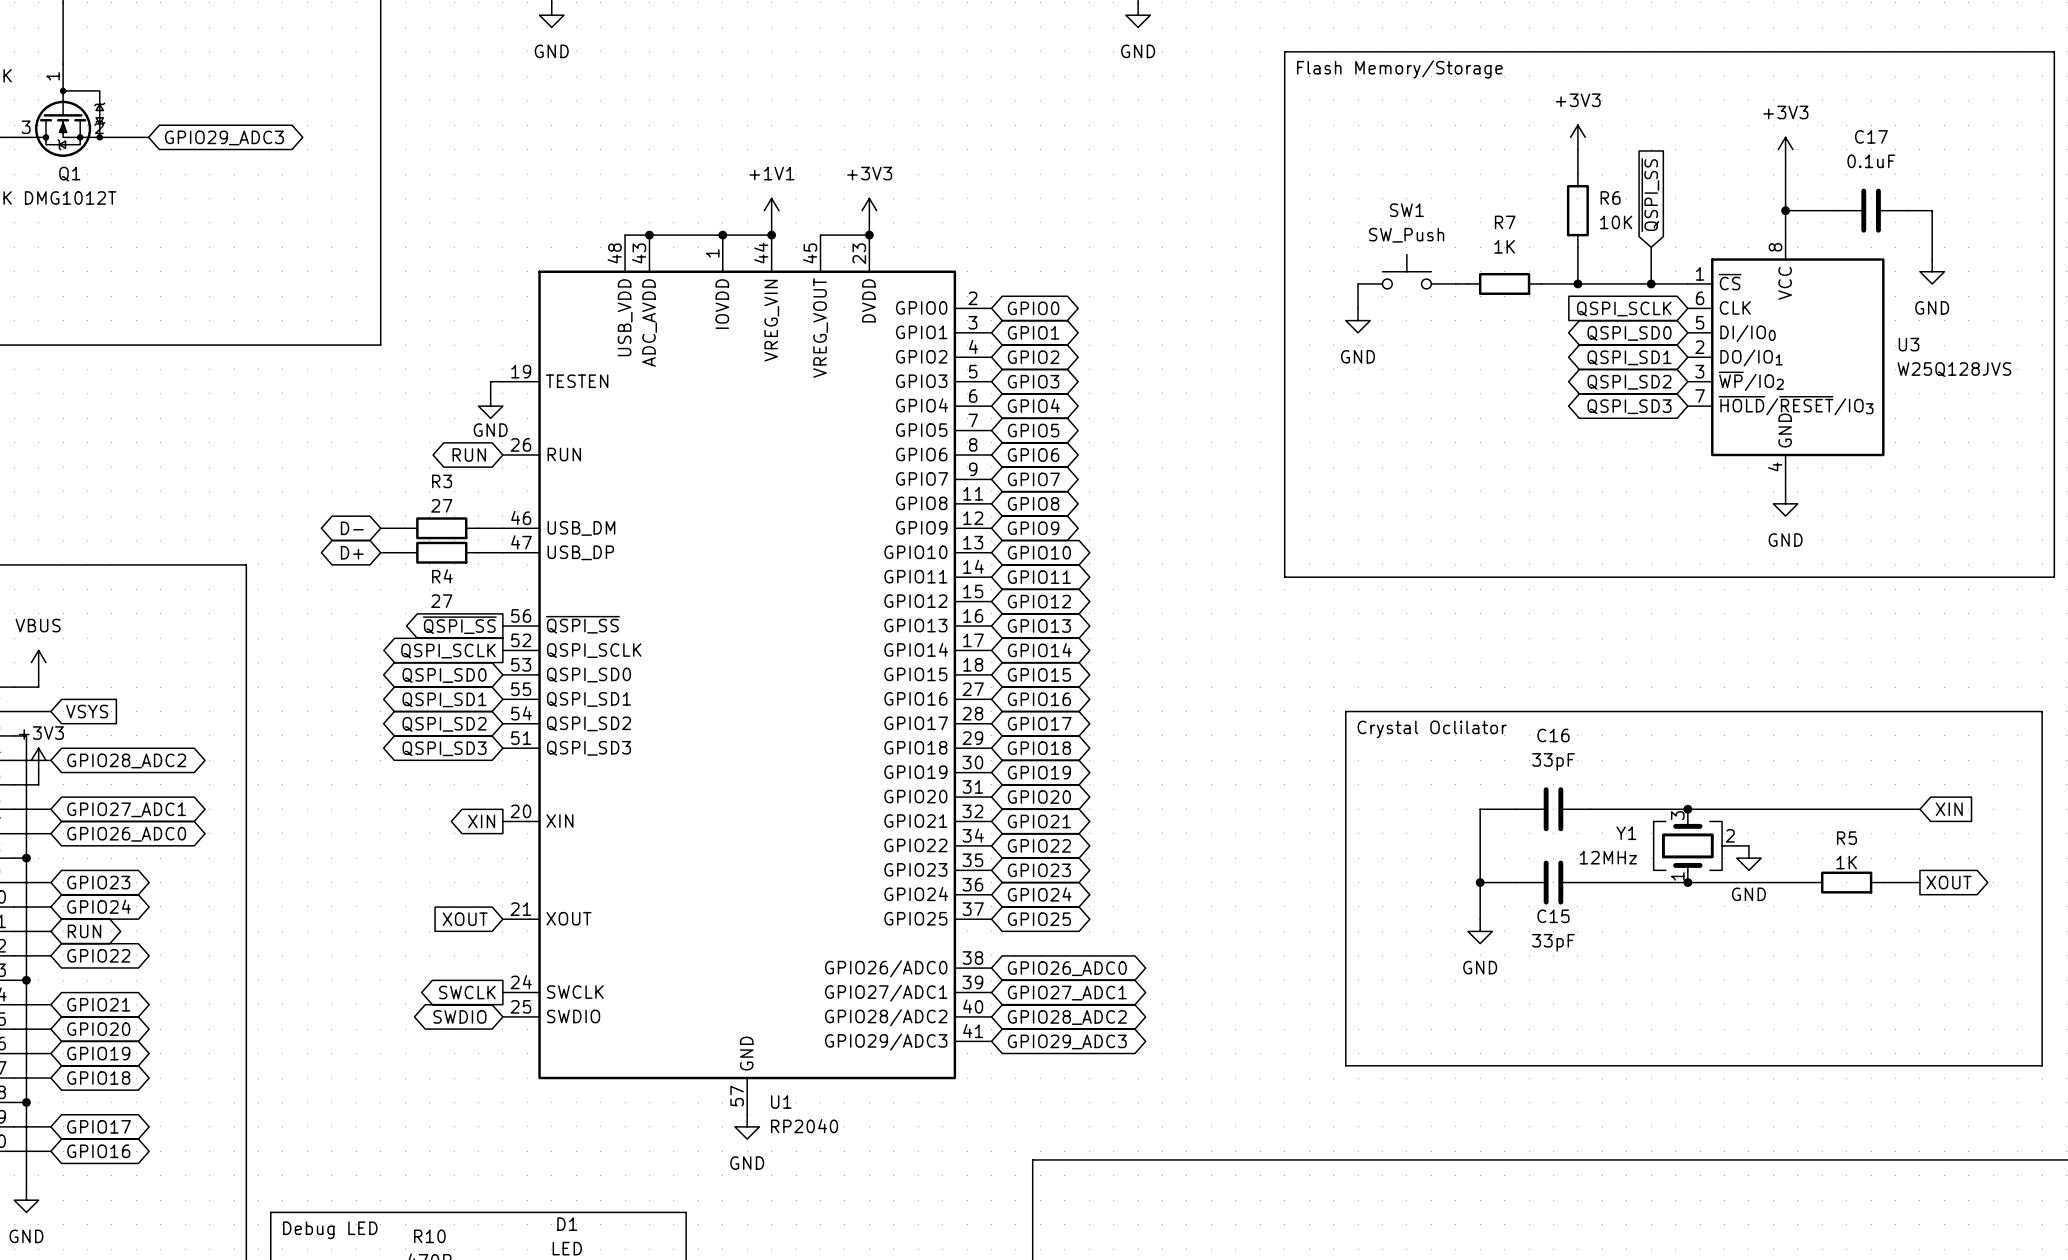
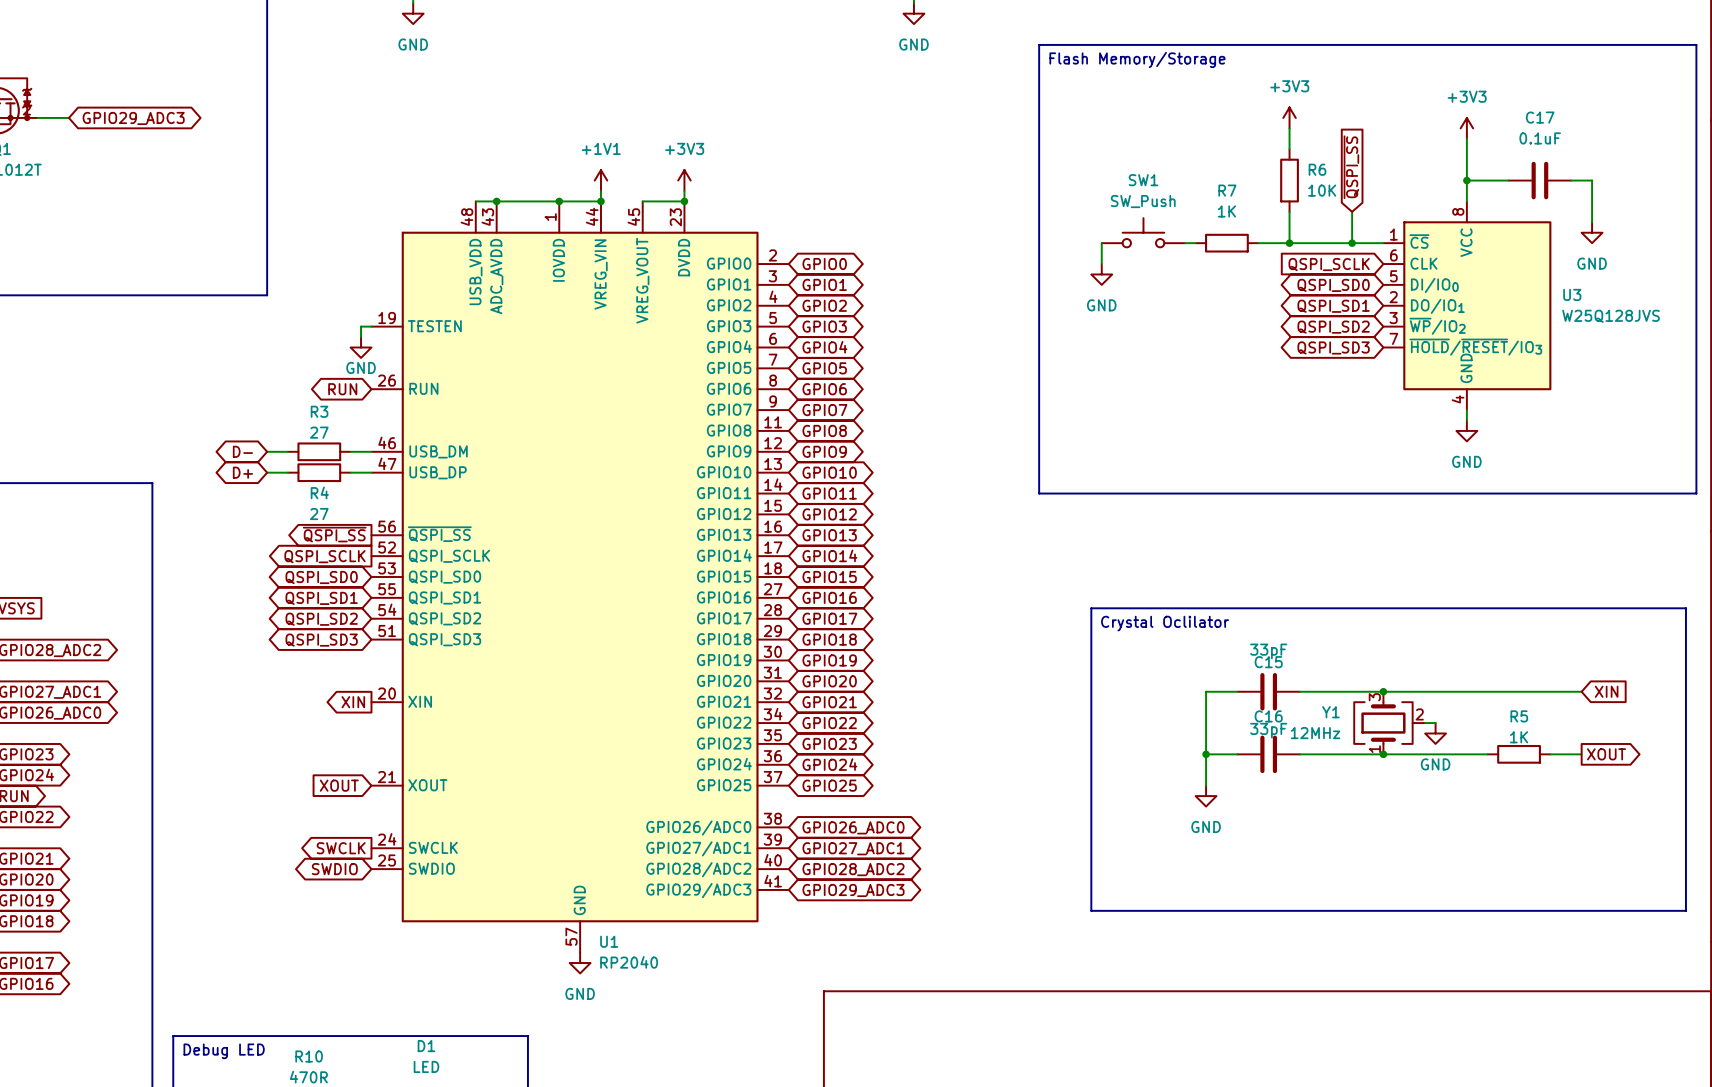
C16 name: C16 (1553, 735) -> C15 (1268, 662)
C15 name: C15 (1553, 916) -> C16 (1268, 716)
C15 value position: 33pF (1553, 942) -> 33pF (1268, 730)

